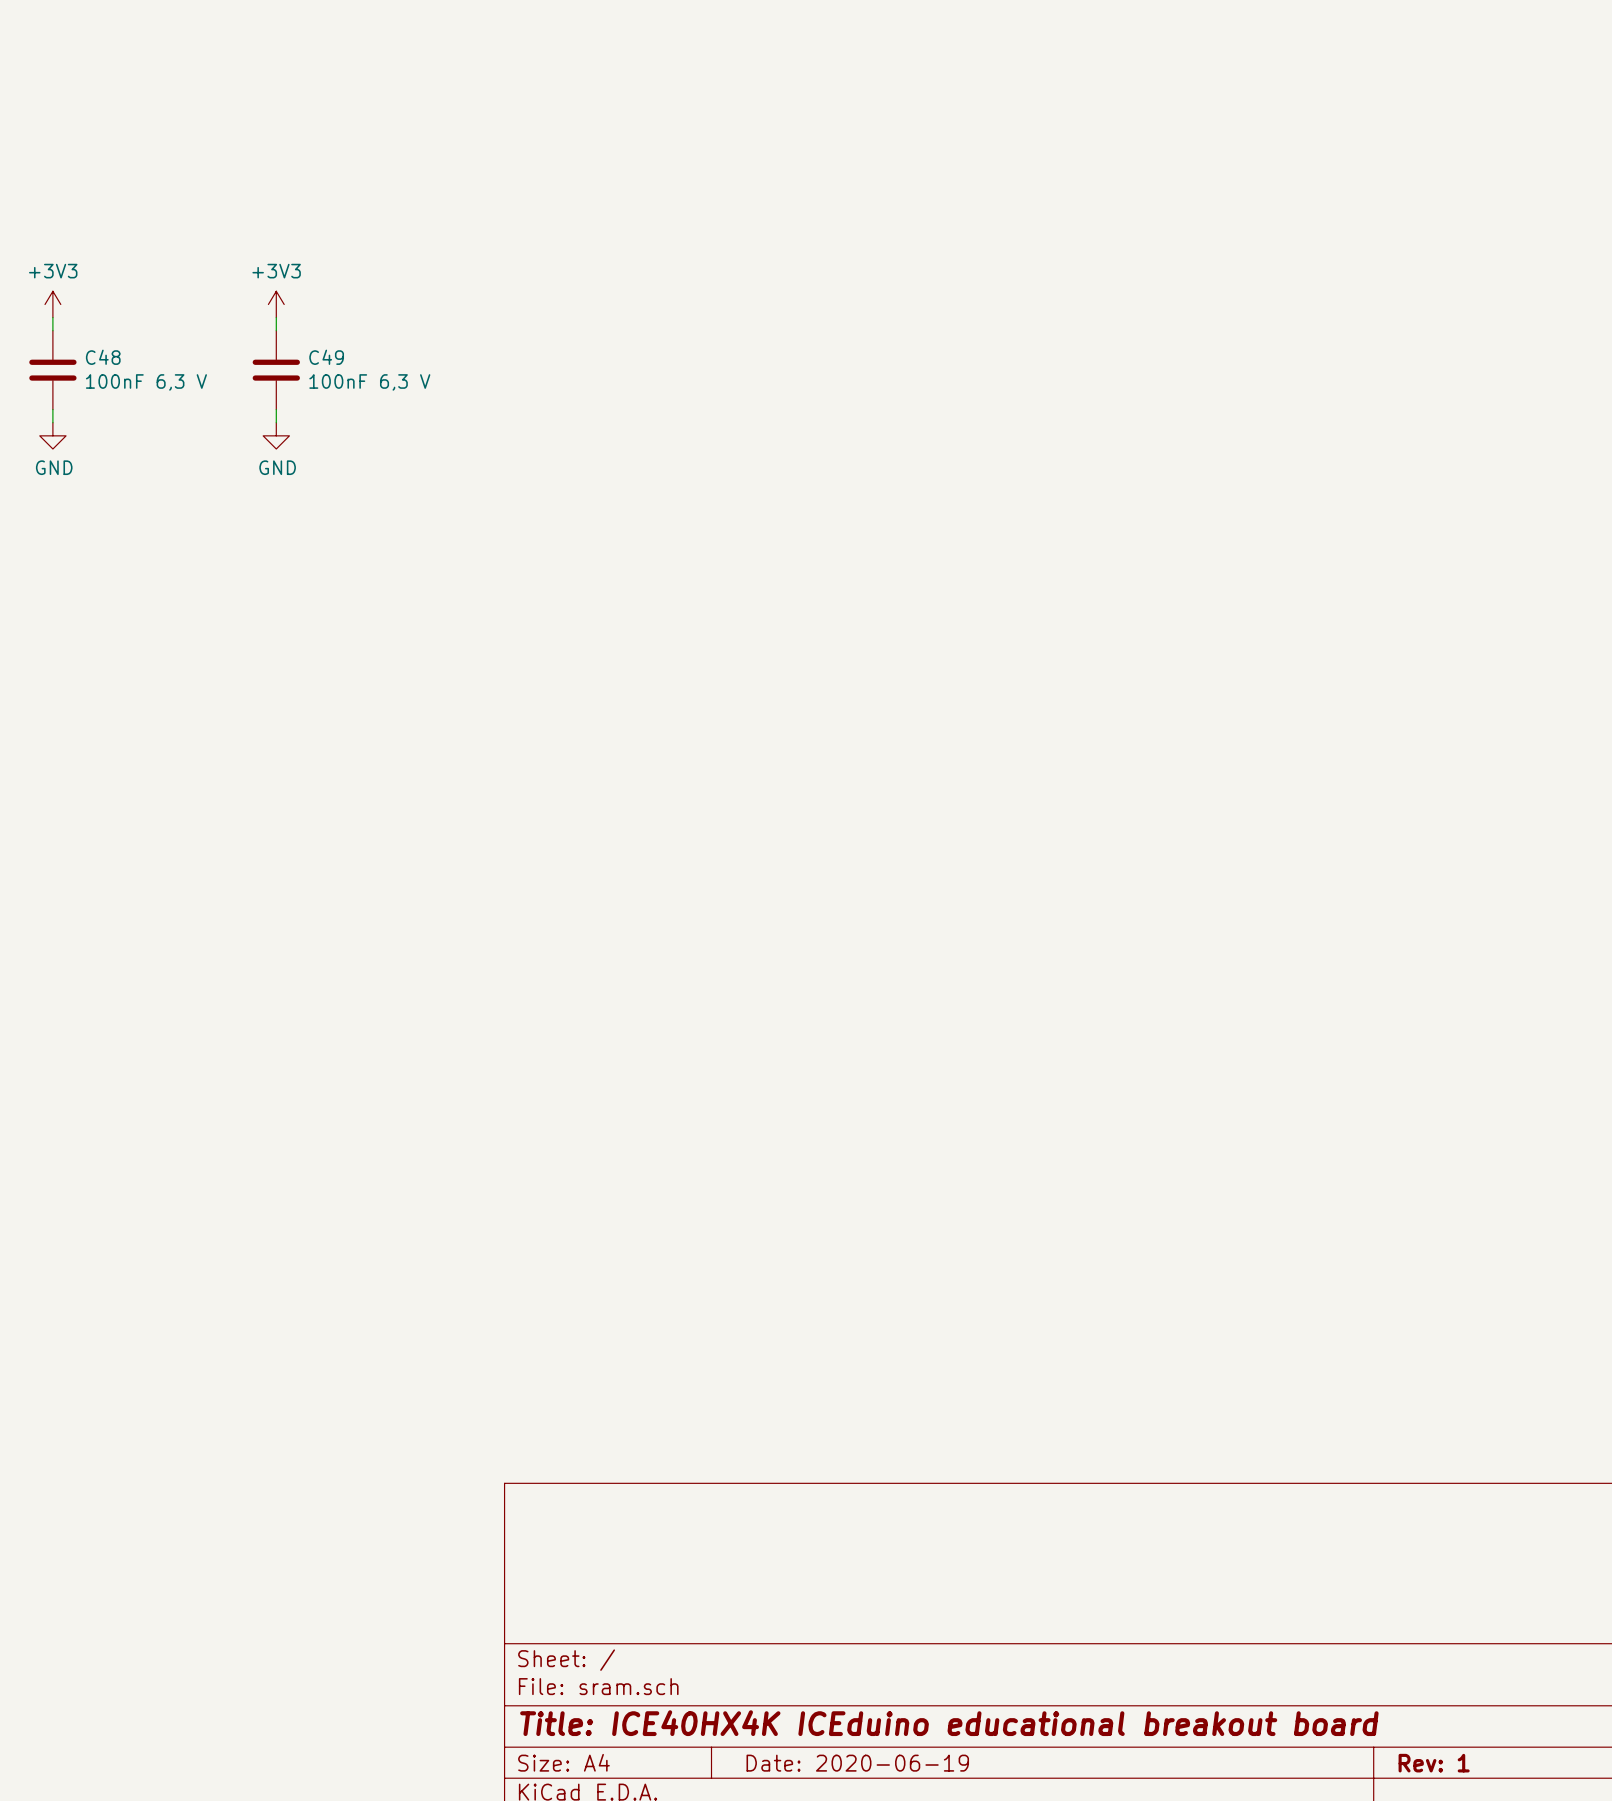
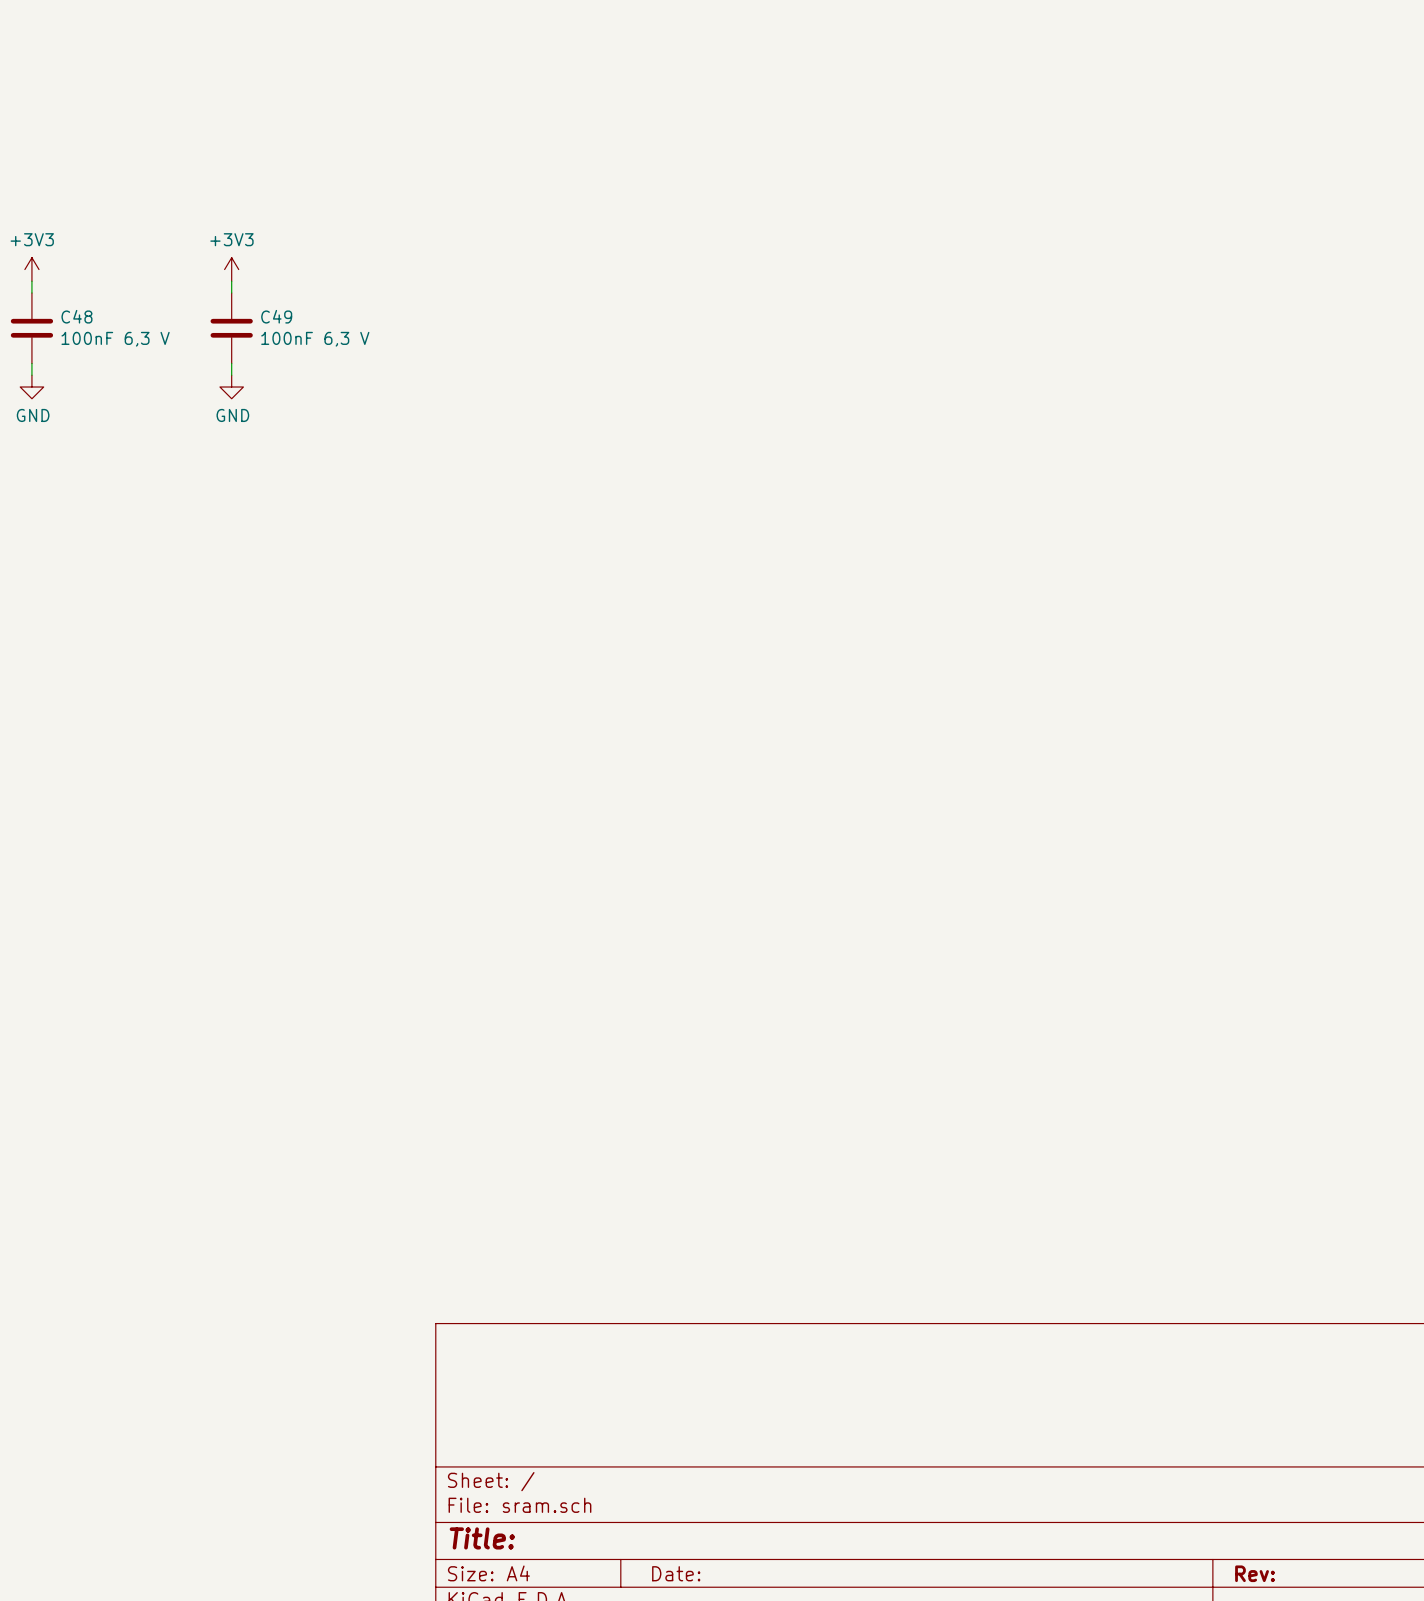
title block: Title: ICE40HX4K ICEduino educational breakout board (949, 1723) -> Title: (482, 1538)
title block: Date: 2020-06-19 (857, 1763) -> Date: (676, 1573)
title block: Rev: 1 (1434, 1763) -> Rev: (1255, 1573)

